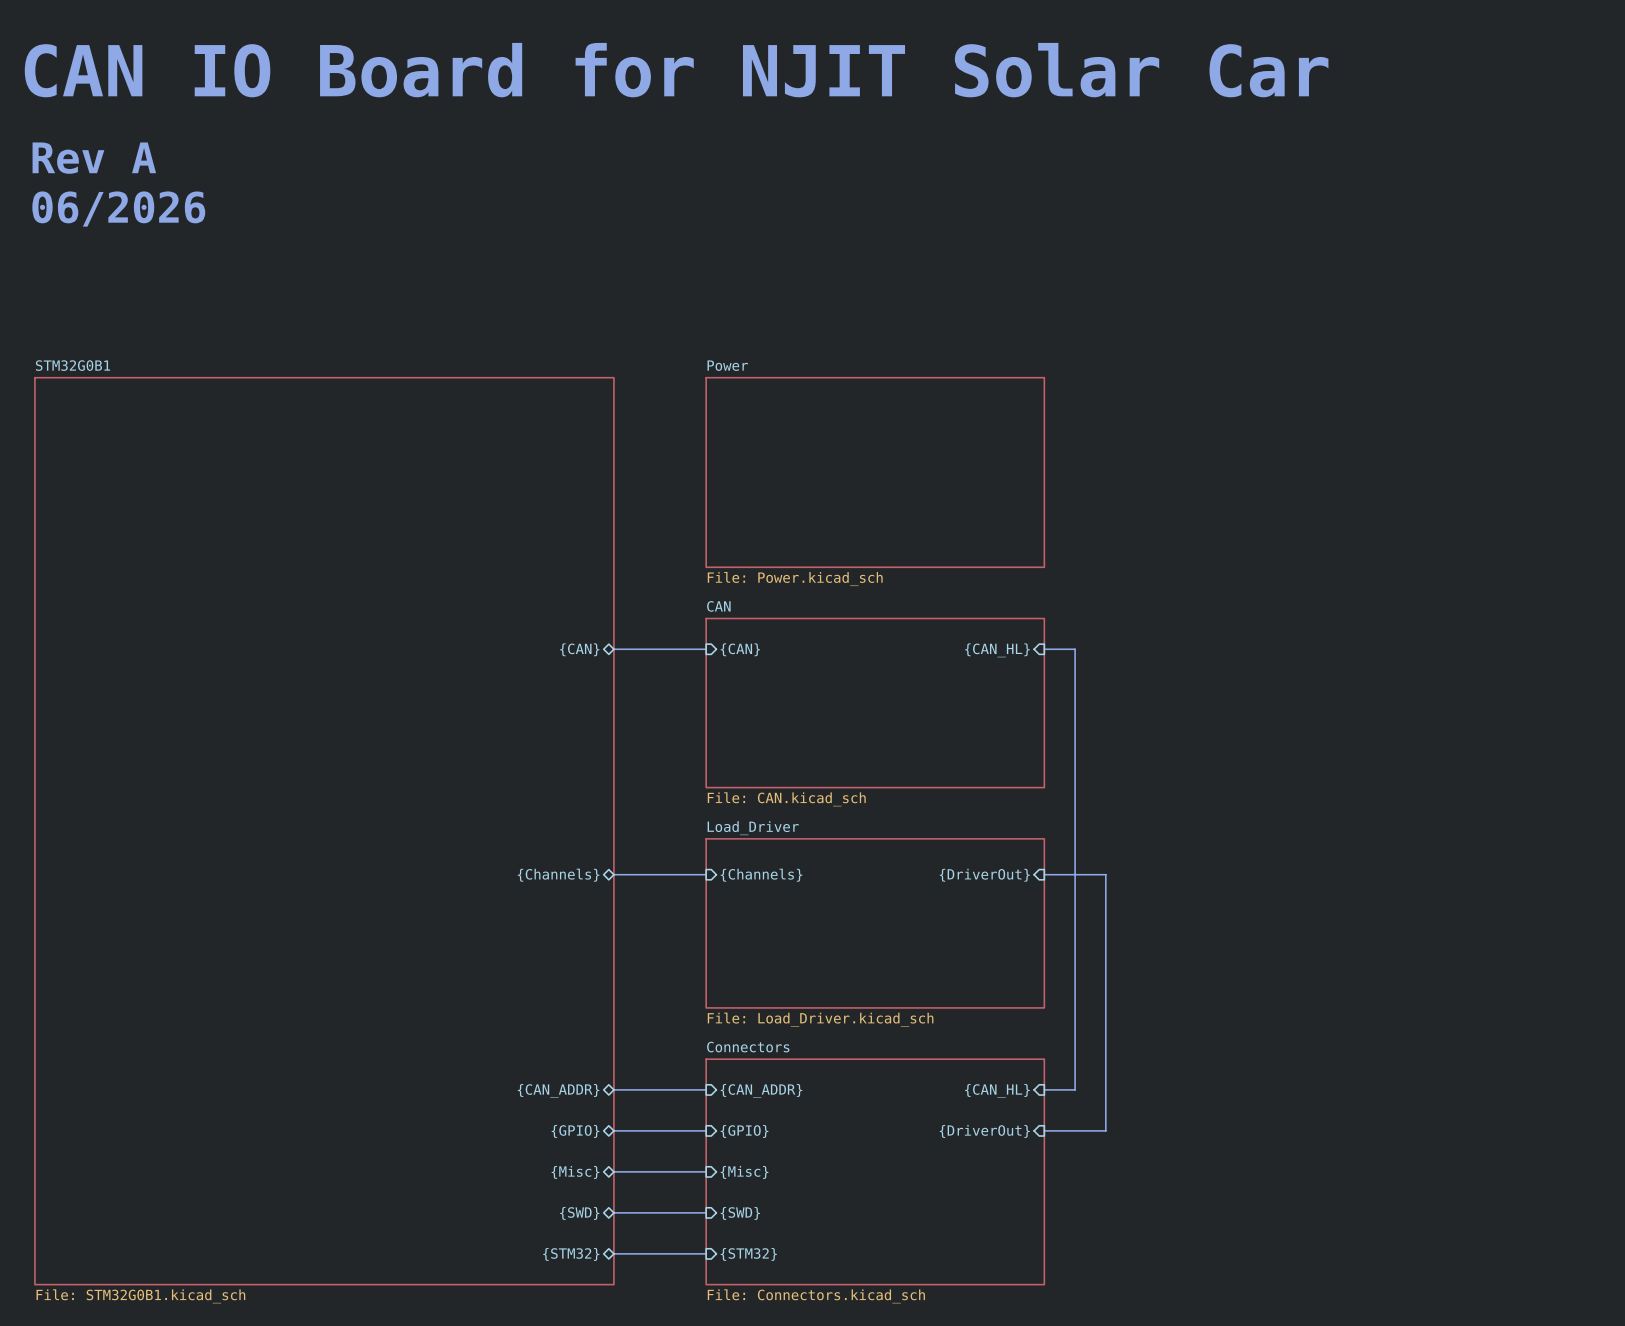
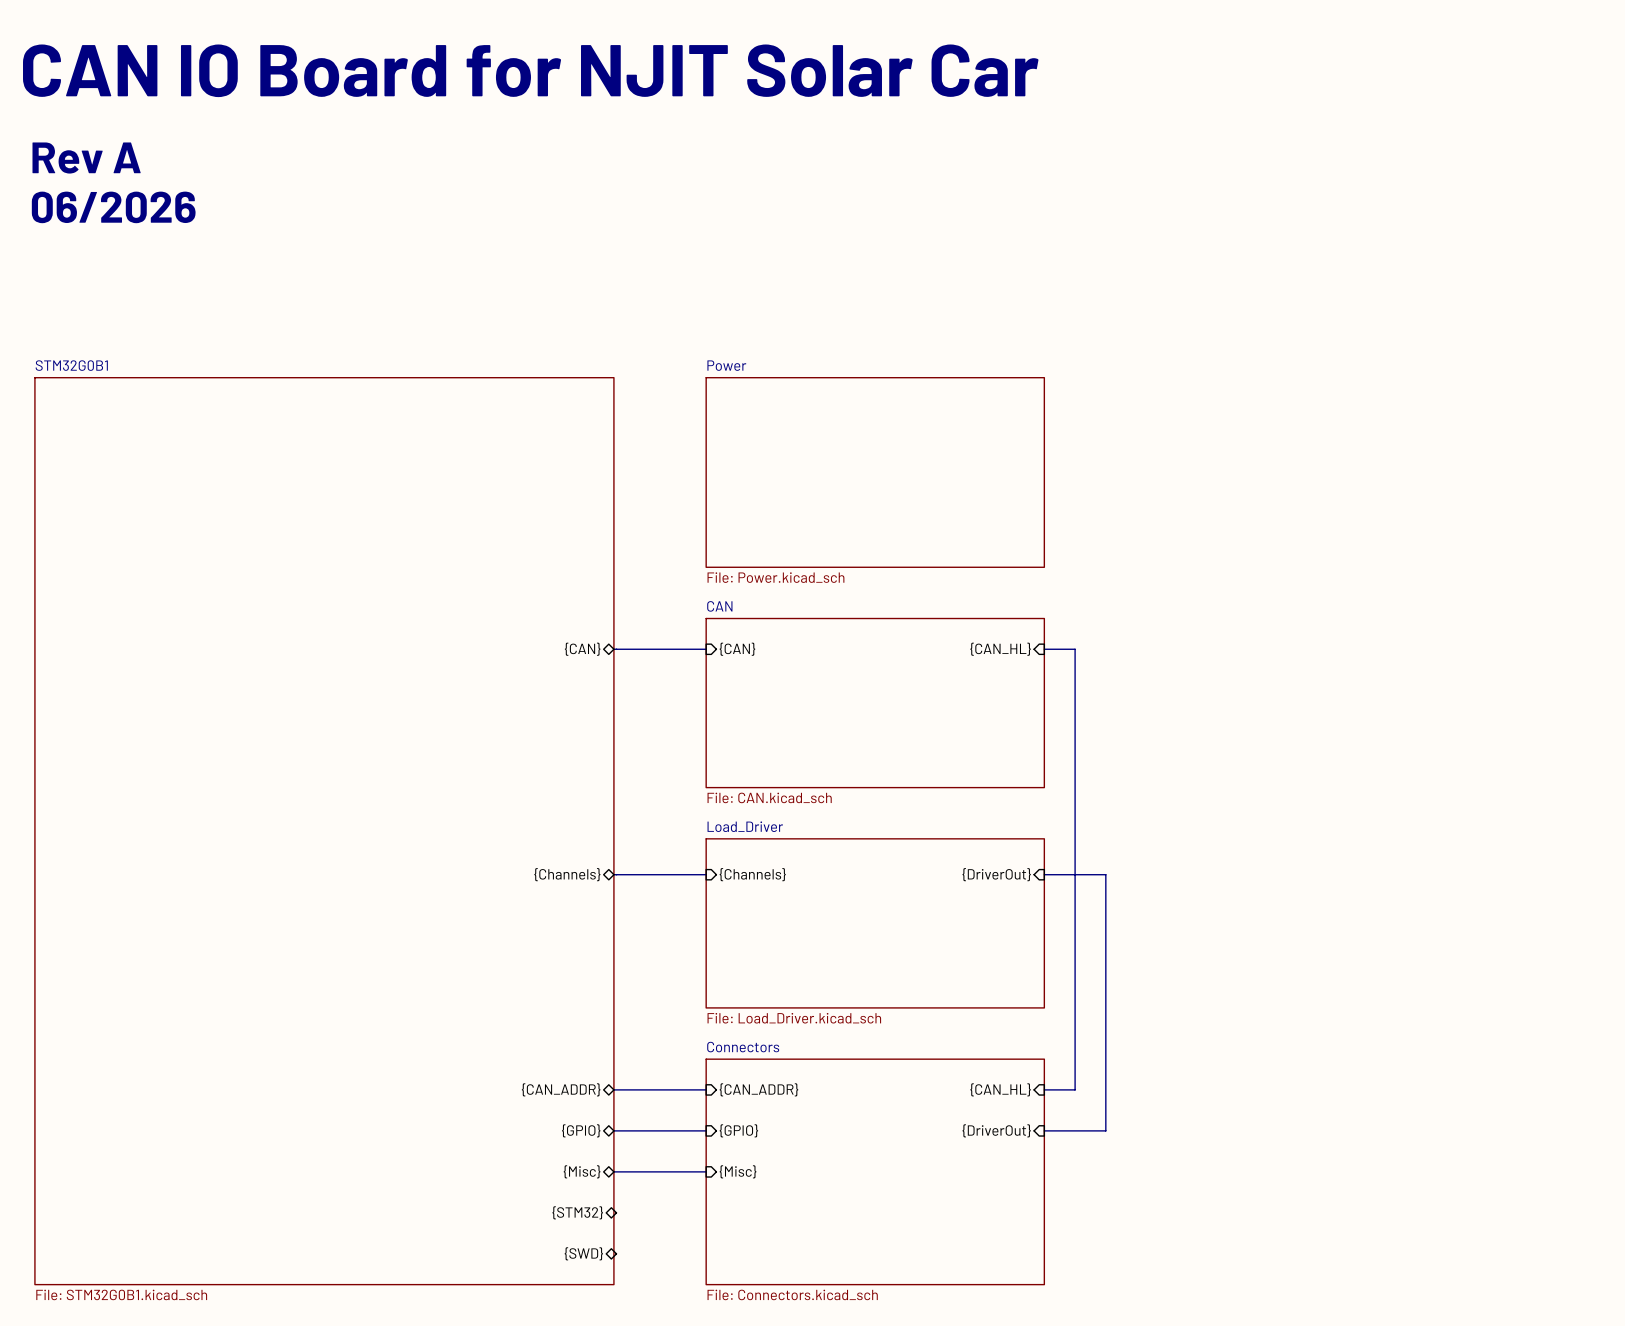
bus: (613, 1212) (706, 1212) -> none
sheet pin position: {SWD} (579, 1213) -> {SWD} (583, 1253)
sheet pin: {SWD} (740, 1213) -> none
bus: (613, 1253) (706, 1253) -> none
sheet pin position: {STM32} (571, 1254) -> {STM32} (577, 1212)
sheet pin: {STM32} (748, 1254) -> none

